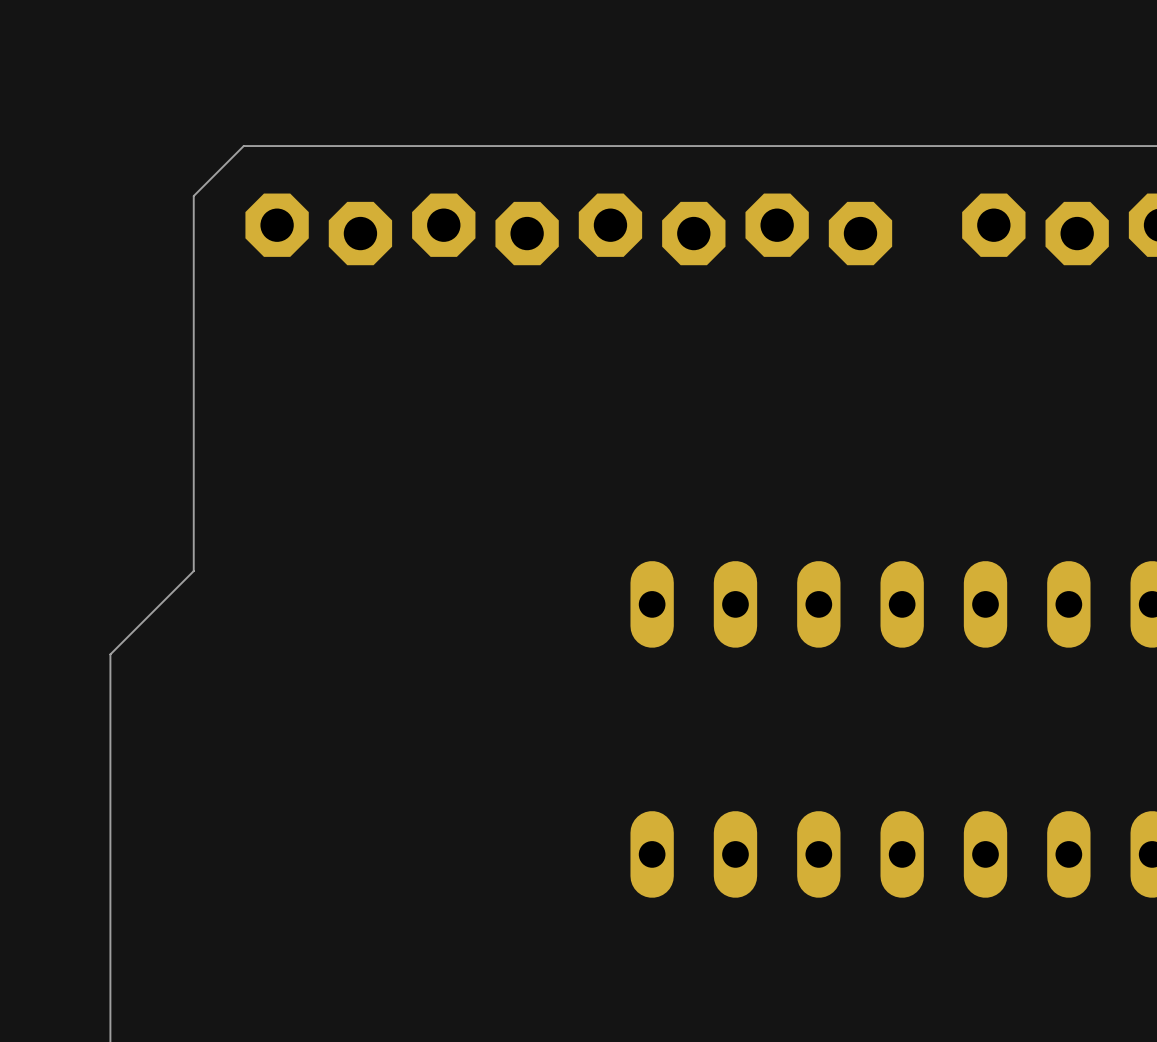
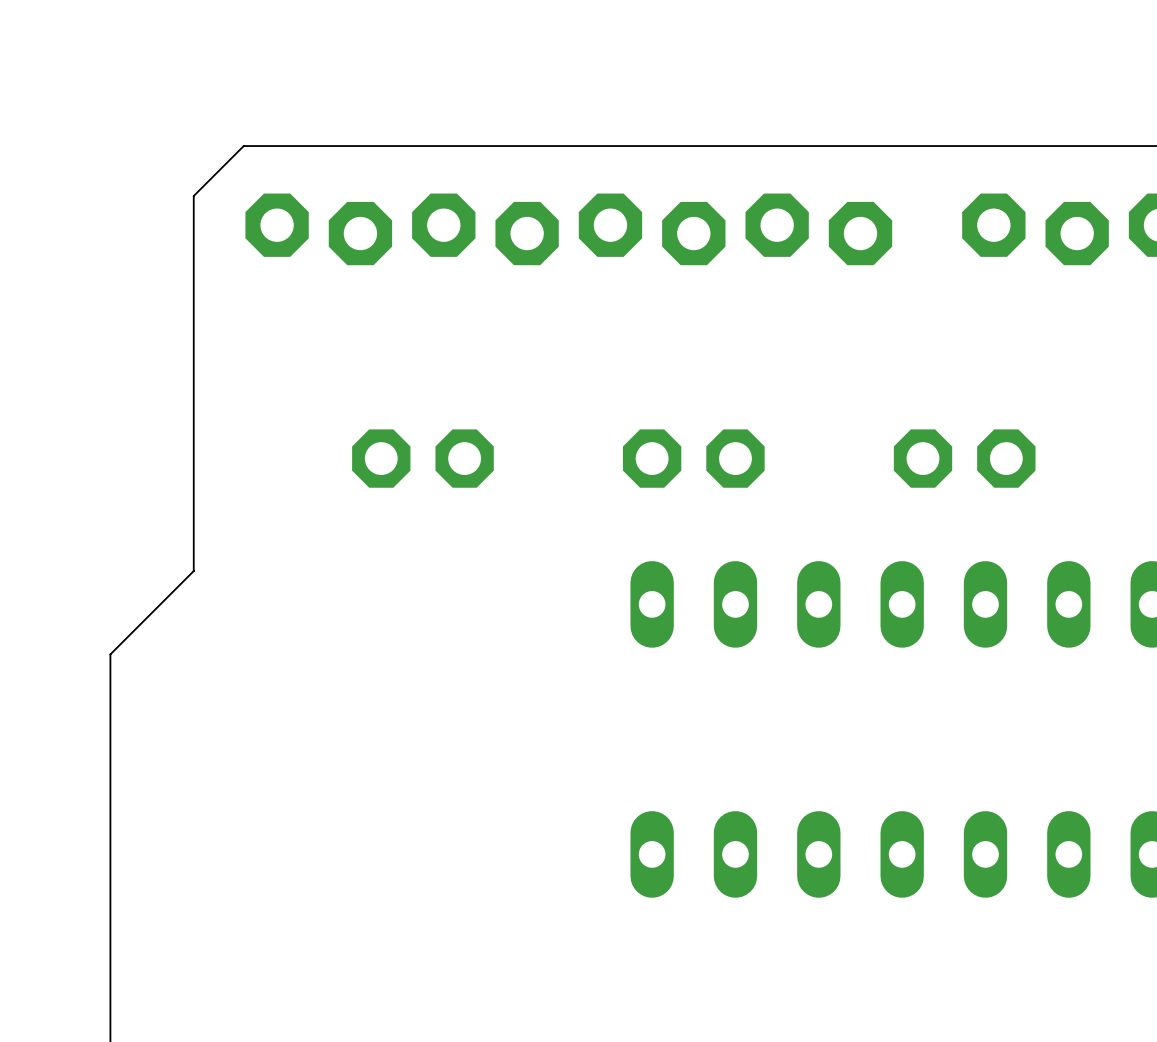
part: none -> (422, 458)
part: none -> (693, 458)
part: none -> (964, 458)

